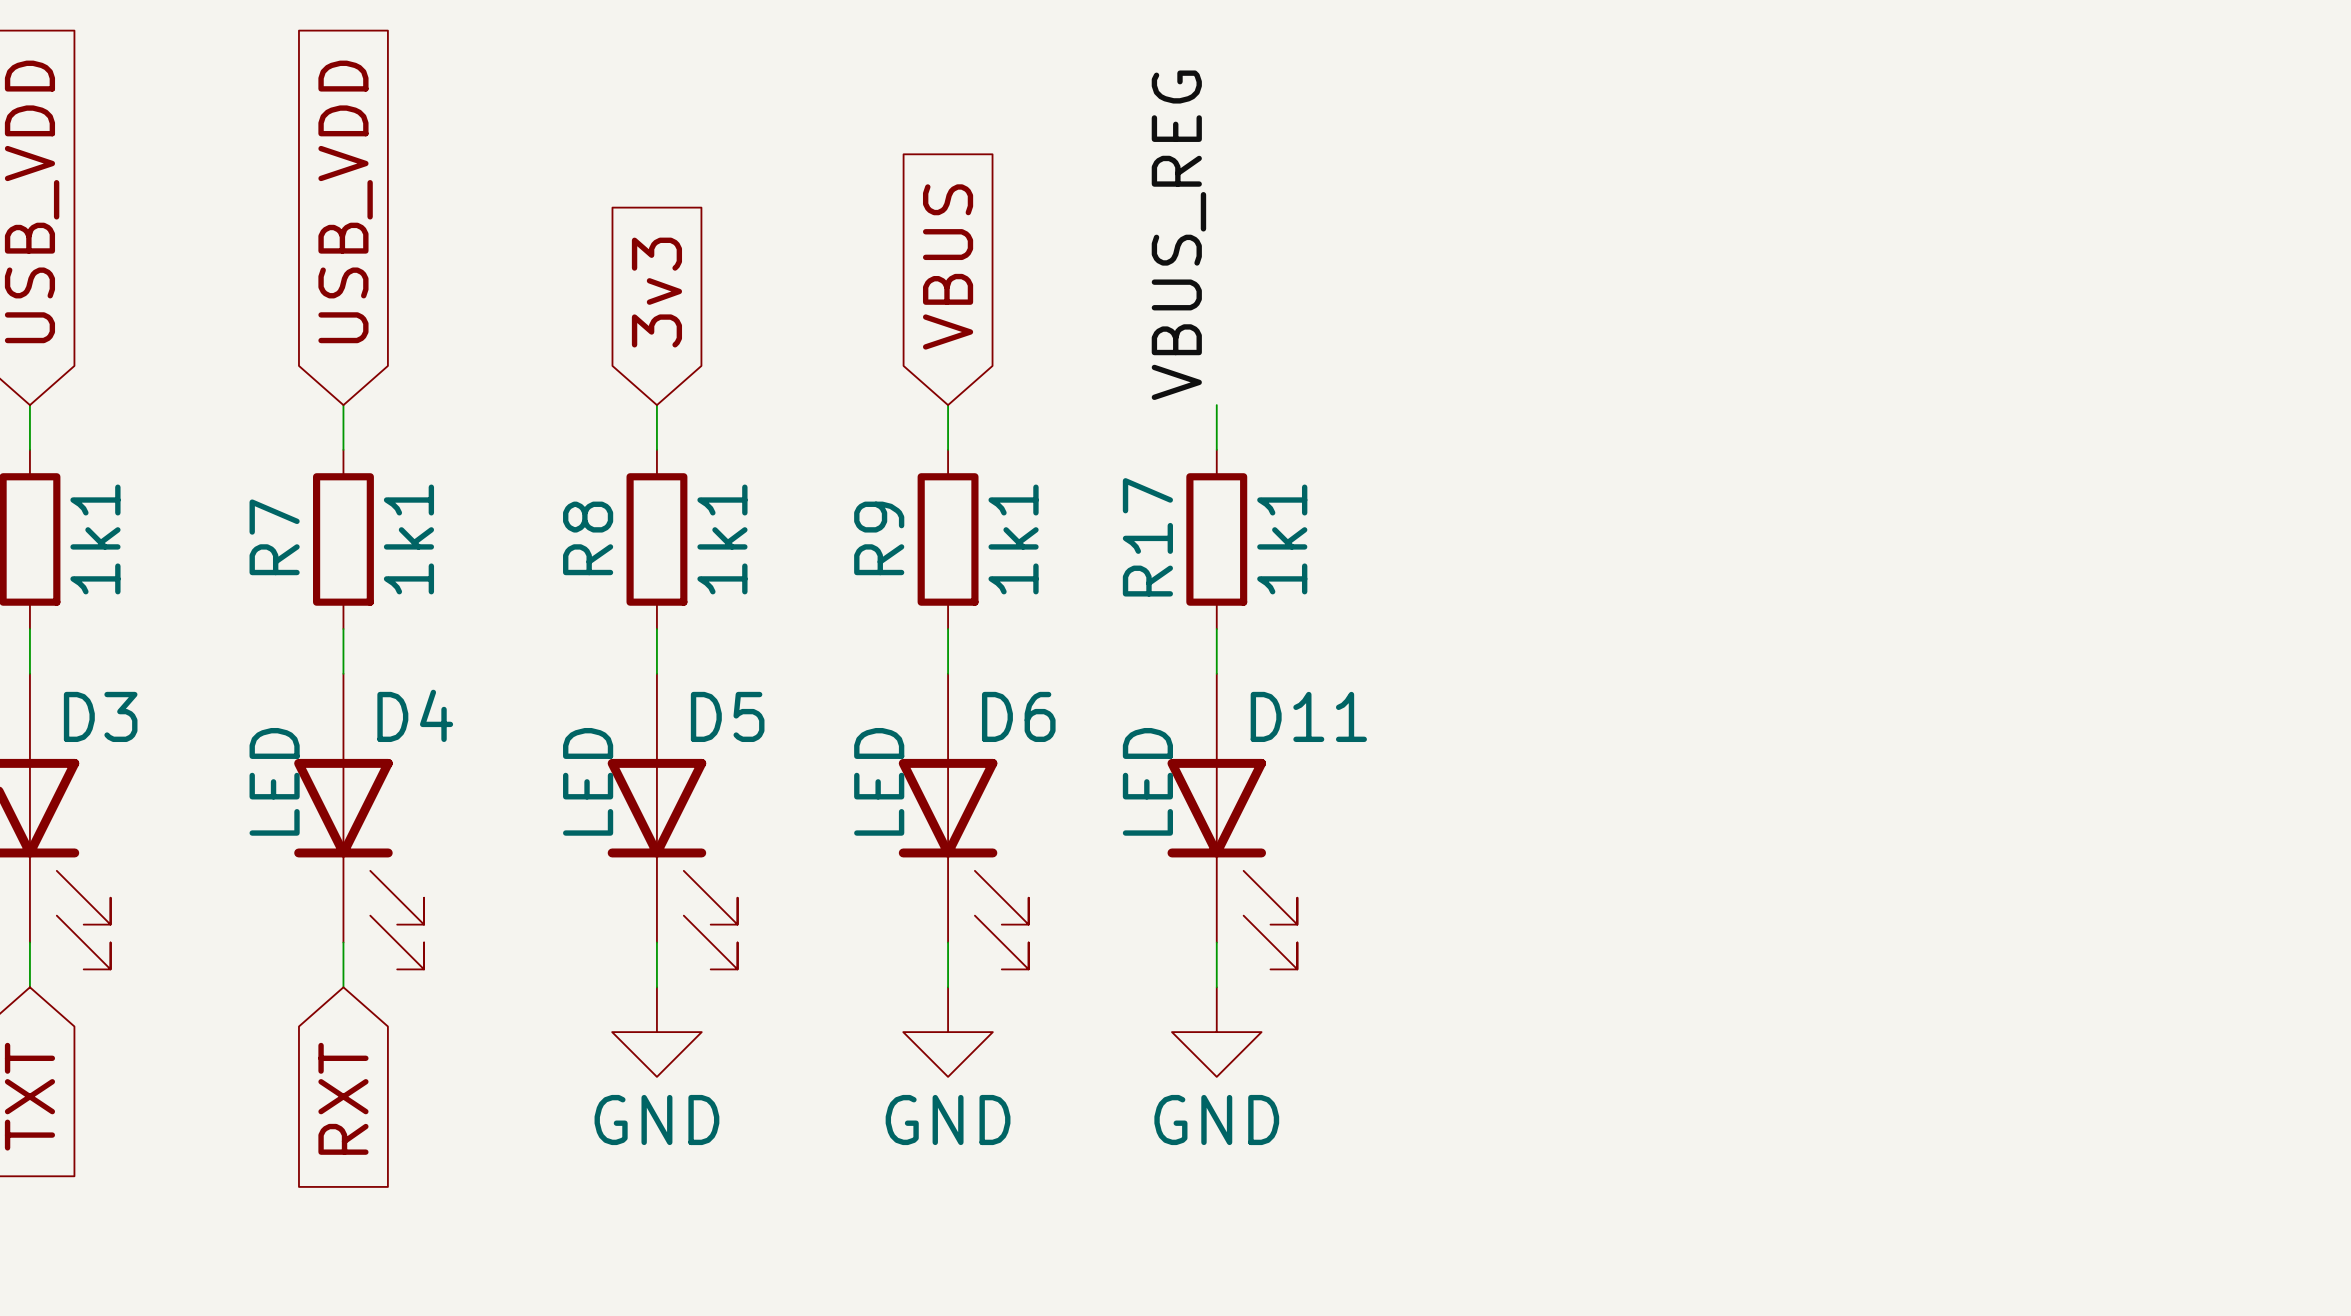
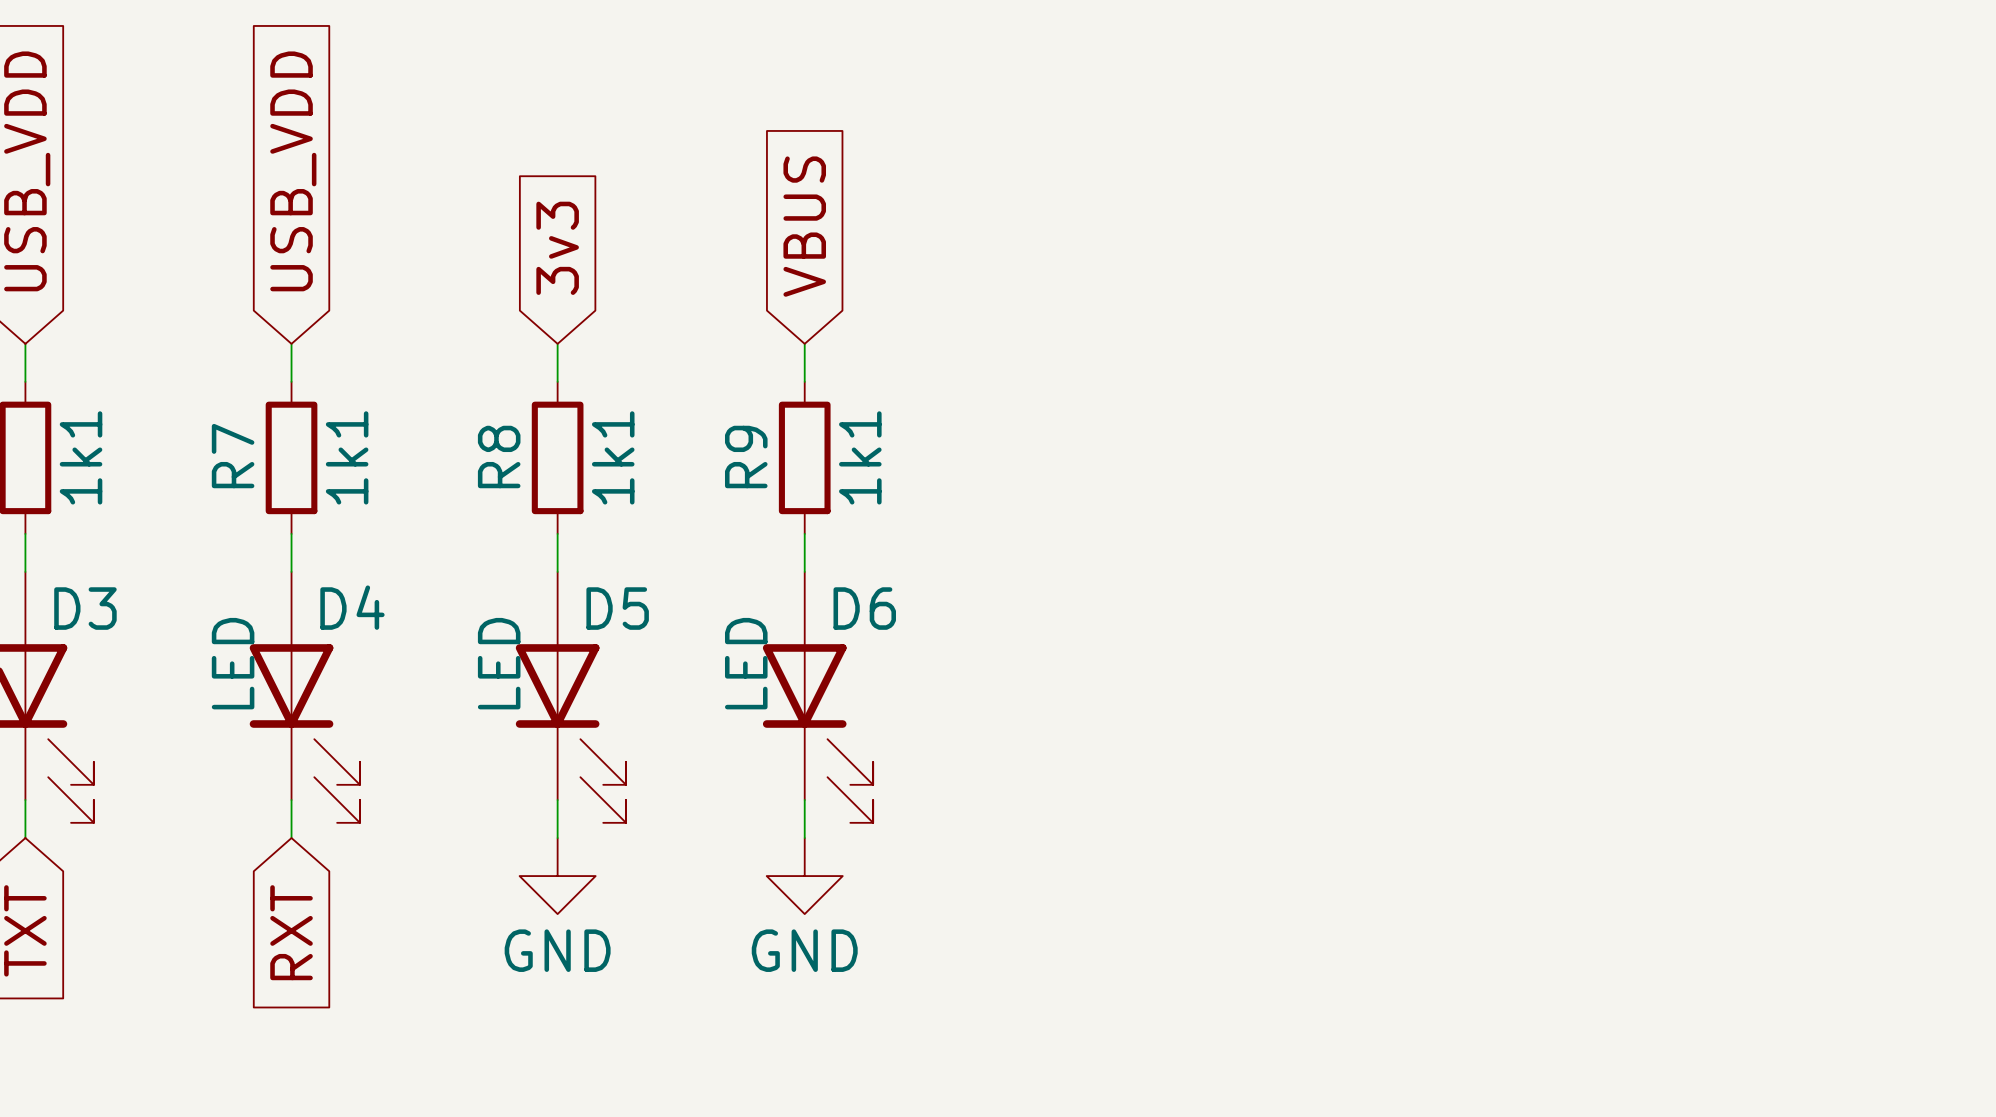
label: VBUS_REG (1178, 235) -> none
wire: (1216, 405) (1216, 449) -> none
R17: 1k1 (1216, 539) -> none
wire: (1216, 629) (1216, 673) -> none
D11: LED (1232, 821) -> none
wire: (1216, 942) (1216, 987) -> none
power symbol: GND (1216, 1032) -> none

